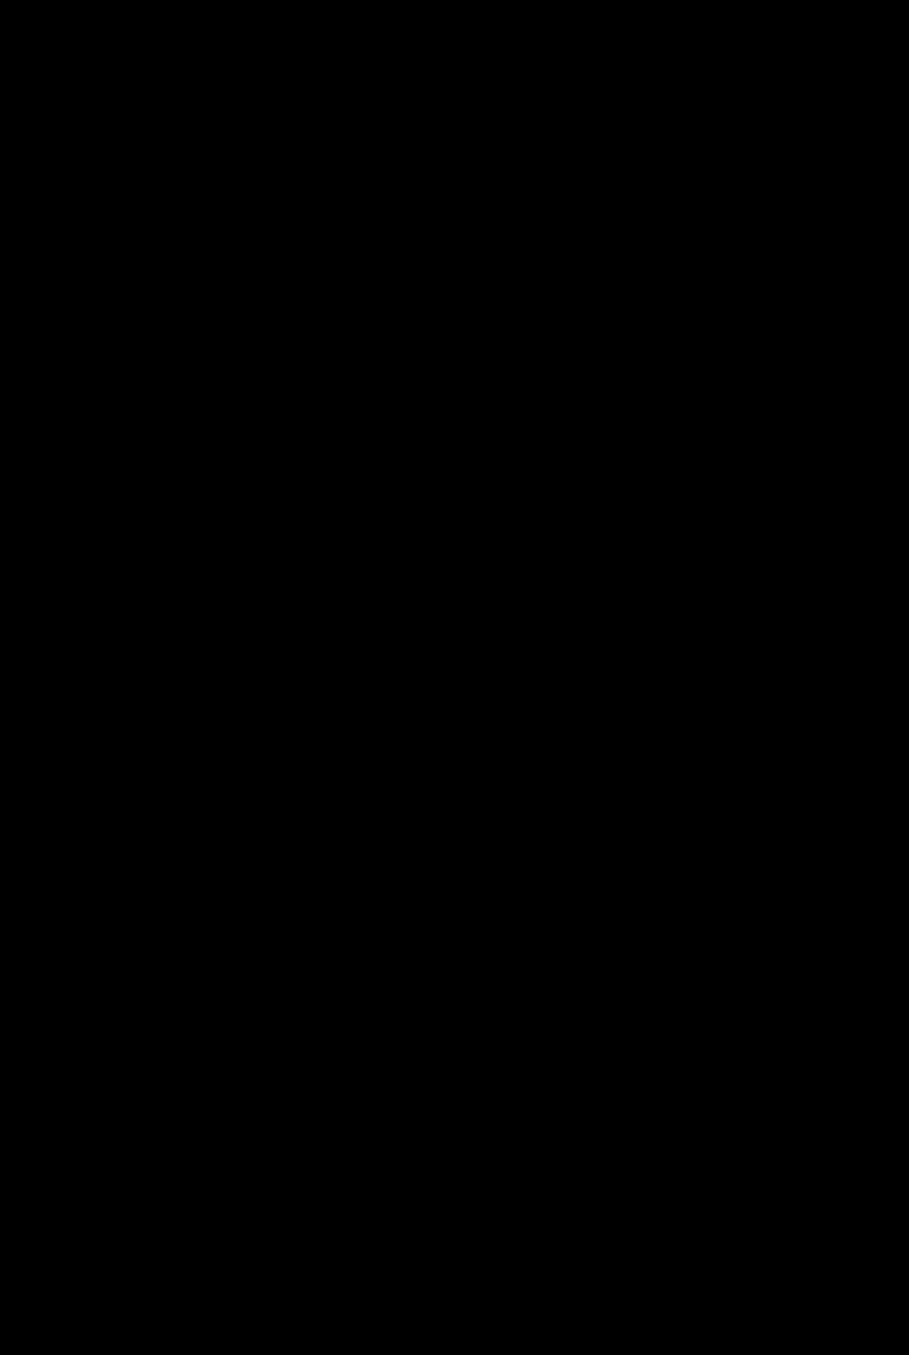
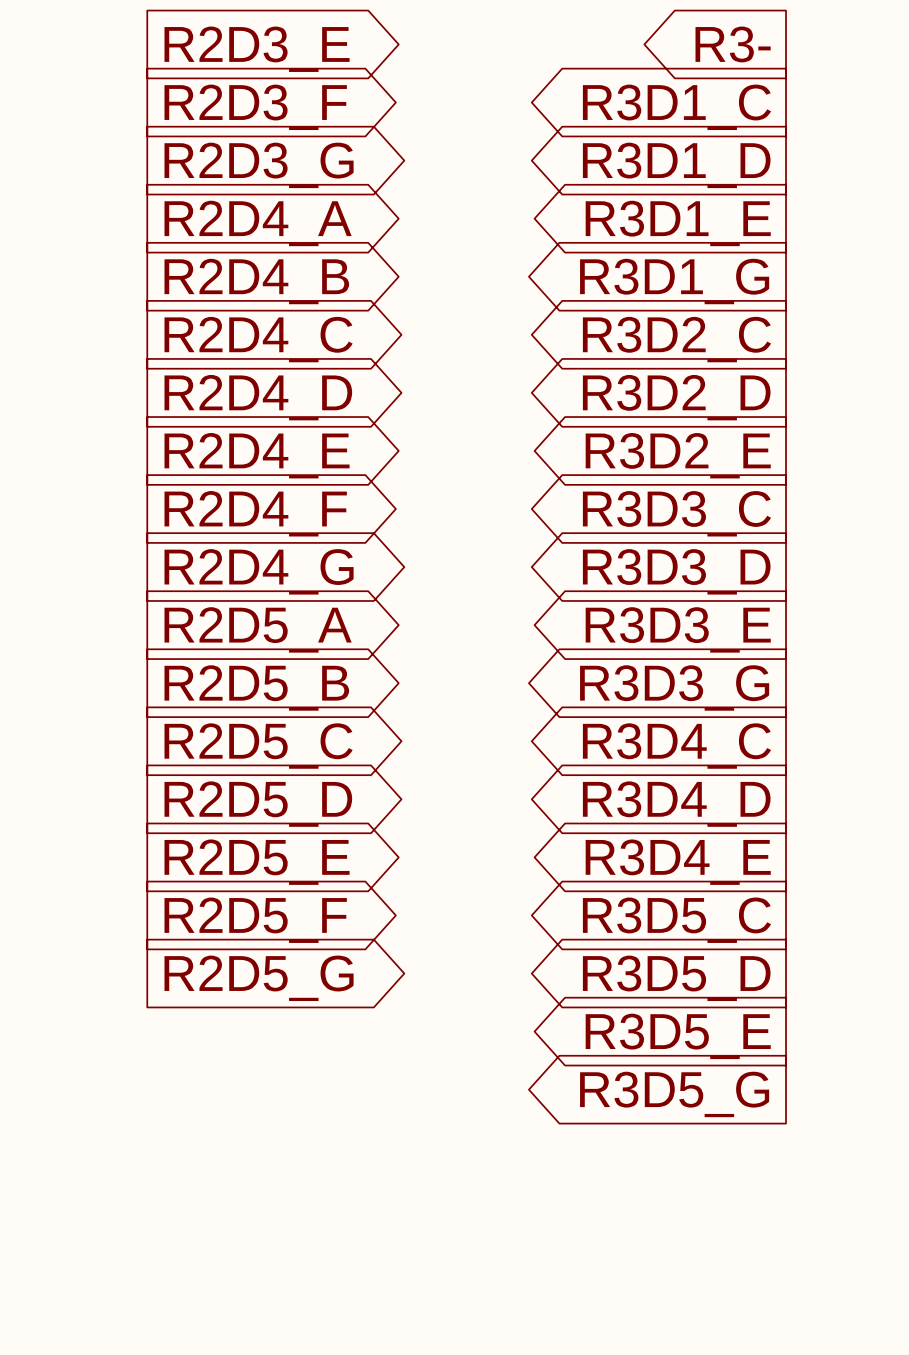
global label: none -> R3- (733, 44)
global label: none -> R2D3_E (257, 49)
global label: none -> R2D3_F (255, 107)
global label: none -> R3D1_C (676, 107)
global label: none -> R2D3_G (259, 165)
global label: none -> R3D1_D (676, 165)
global label: none -> R2D4_A (258, 223)
global label: none -> R3D1_E (678, 223)
global label: none -> R2D4_B (256, 281)
global label: none -> R3D1_G (674, 281)
global label: none -> R2D4_C (258, 339)
global label: none -> R3D2_C (676, 339)
global label: none -> R2D4_D (258, 397)
global label: none -> R3D2_D (676, 397)
global label: none -> R2D4_E (257, 455)
global label: none -> R3D2_E (678, 455)
global label: none -> R2D4_F (255, 513)
global label: none -> R3D3_C (676, 513)
global label: none -> R2D4_G (259, 571)
global label: none -> R3D3_D (676, 571)
global label: none -> R2D5_A (258, 629)
global label: none -> R3D3_E (678, 629)
global label: none -> R2D5_B (256, 687)
global label: none -> R3D3_G (674, 687)
global label: none -> R2D5_C (258, 746)
global label: none -> R3D4_C (676, 746)
global label: none -> R2D5_D (258, 804)
global label: none -> R3D4_D (676, 804)
global label: none -> R2D5_E (257, 862)
global label: none -> R3D4_E (678, 862)
global label: none -> R2D5_F (255, 920)
global label: none -> R3D5_C (676, 920)
global label: none -> R2D5_G (259, 978)
global label: none -> R3D5_D (676, 978)
global label: none -> R3D5_E (678, 1036)
global label: none -> R3D5_G (674, 1094)

